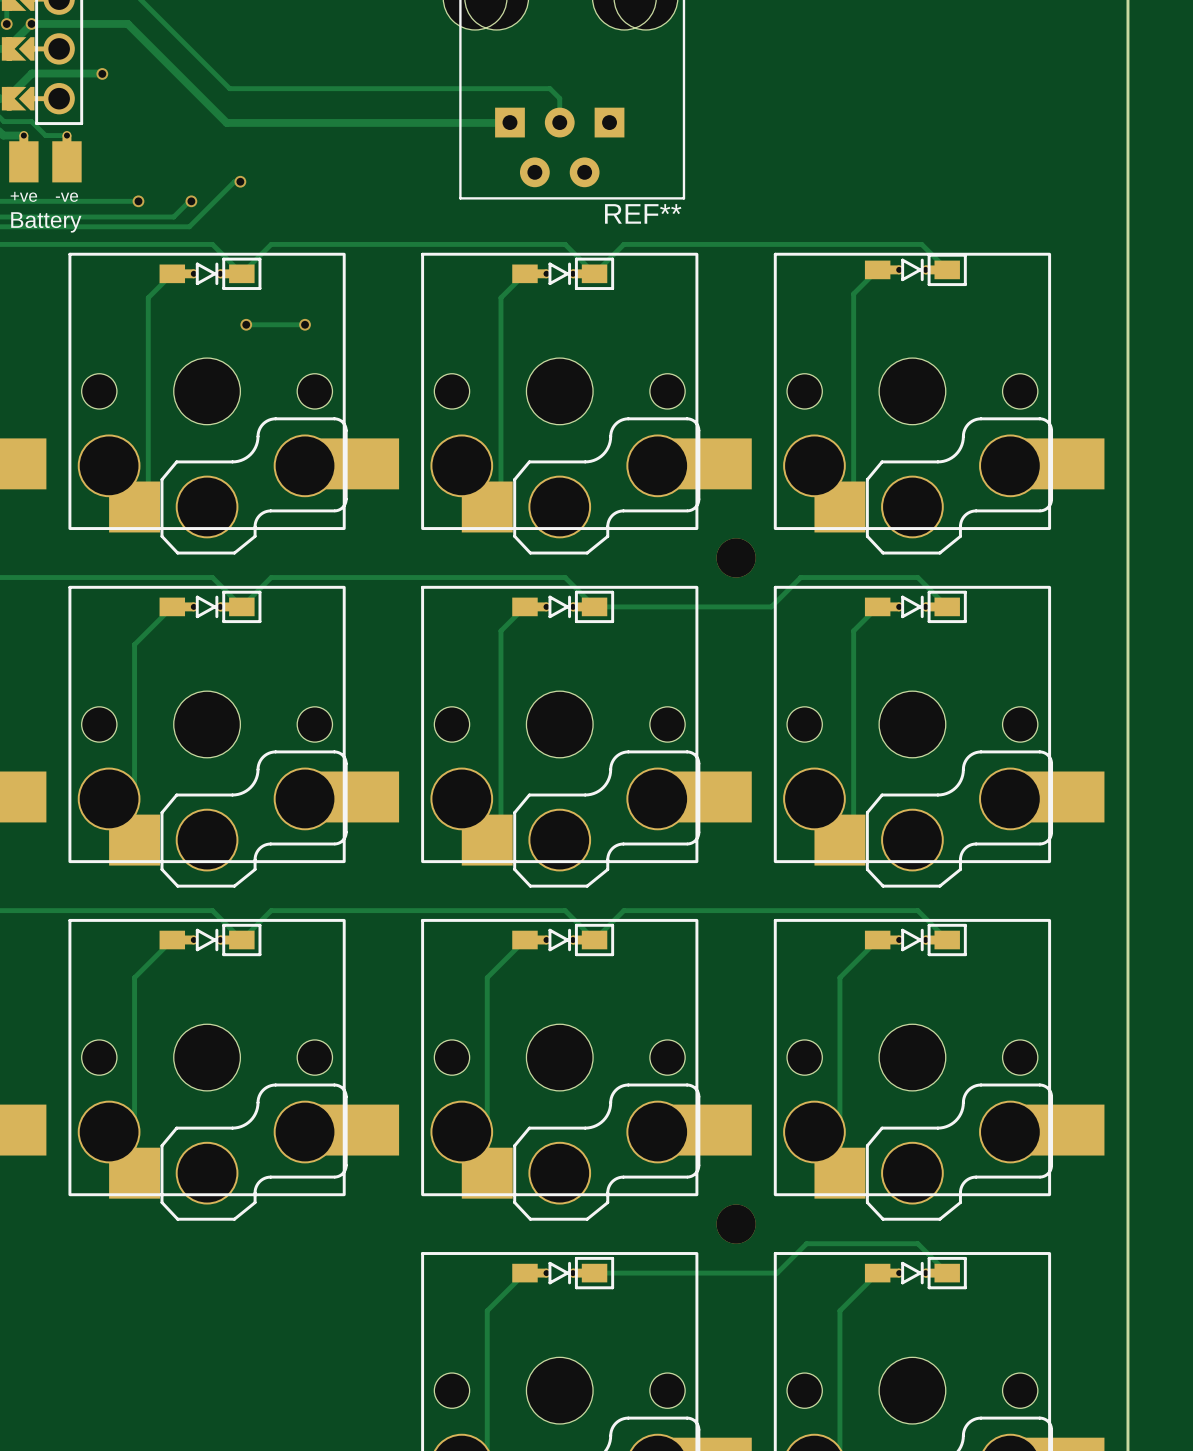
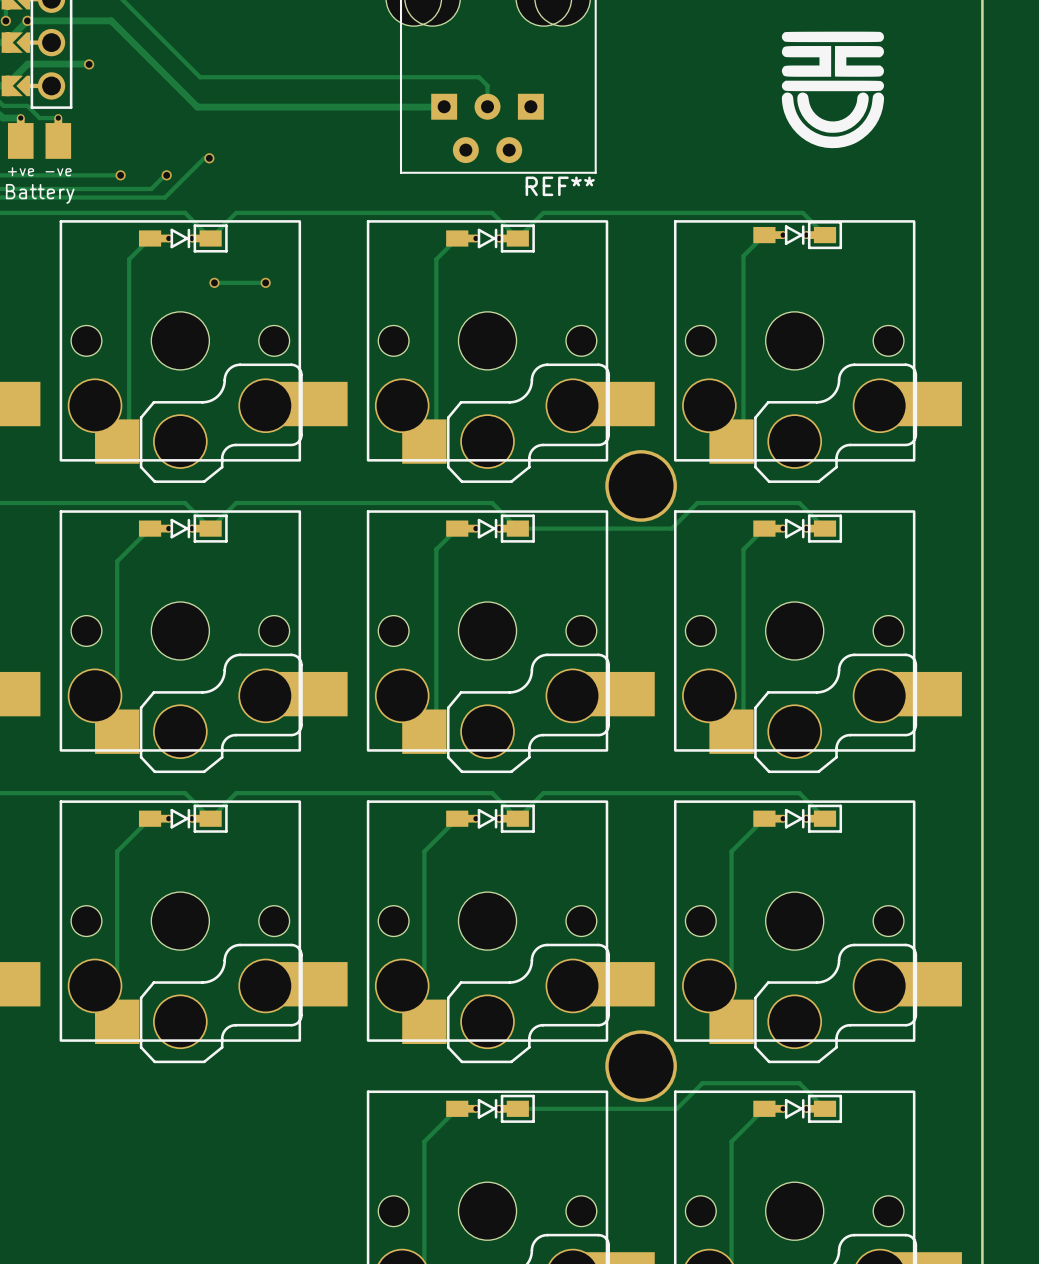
drawing: none -> [781, 31, 885, 149]
part footprint: [716, 538, 756, 578] -> [605, 450, 677, 522]
part footprint: [716, 1204, 756, 1244] -> [605, 1030, 677, 1102]

